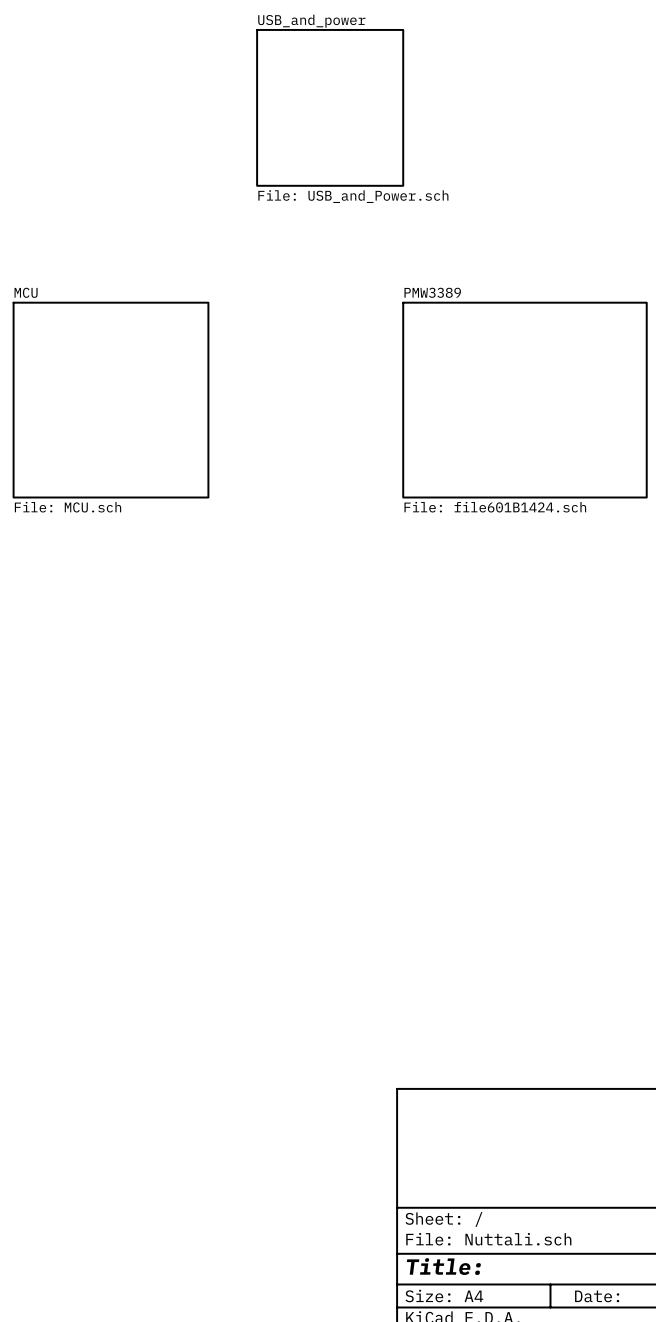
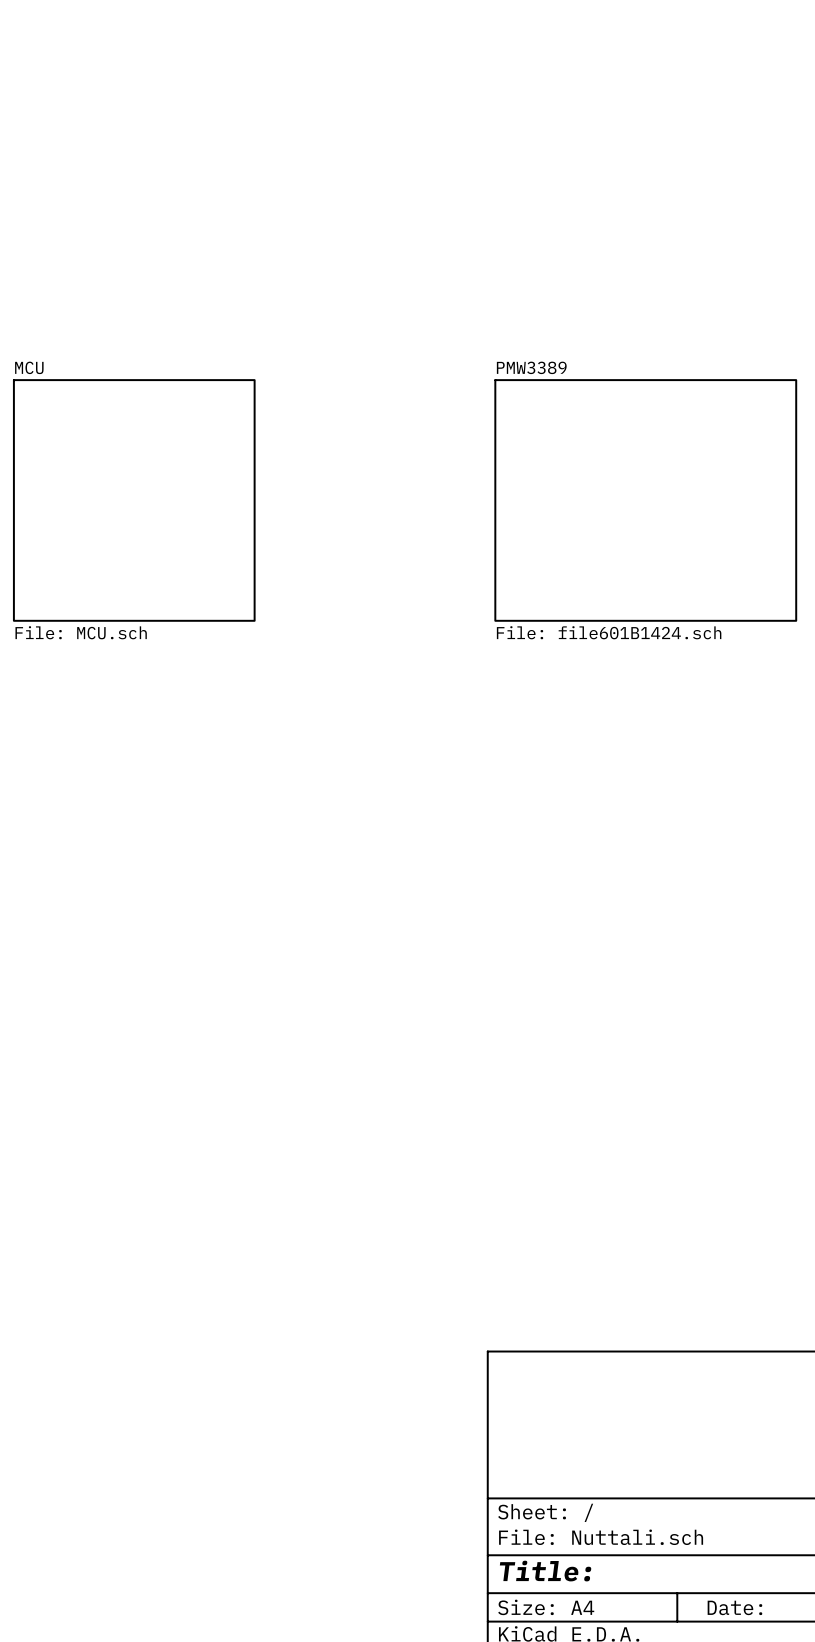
sheet USB_and_power: File: USB_and_Power.sch (330, 107) -> none

